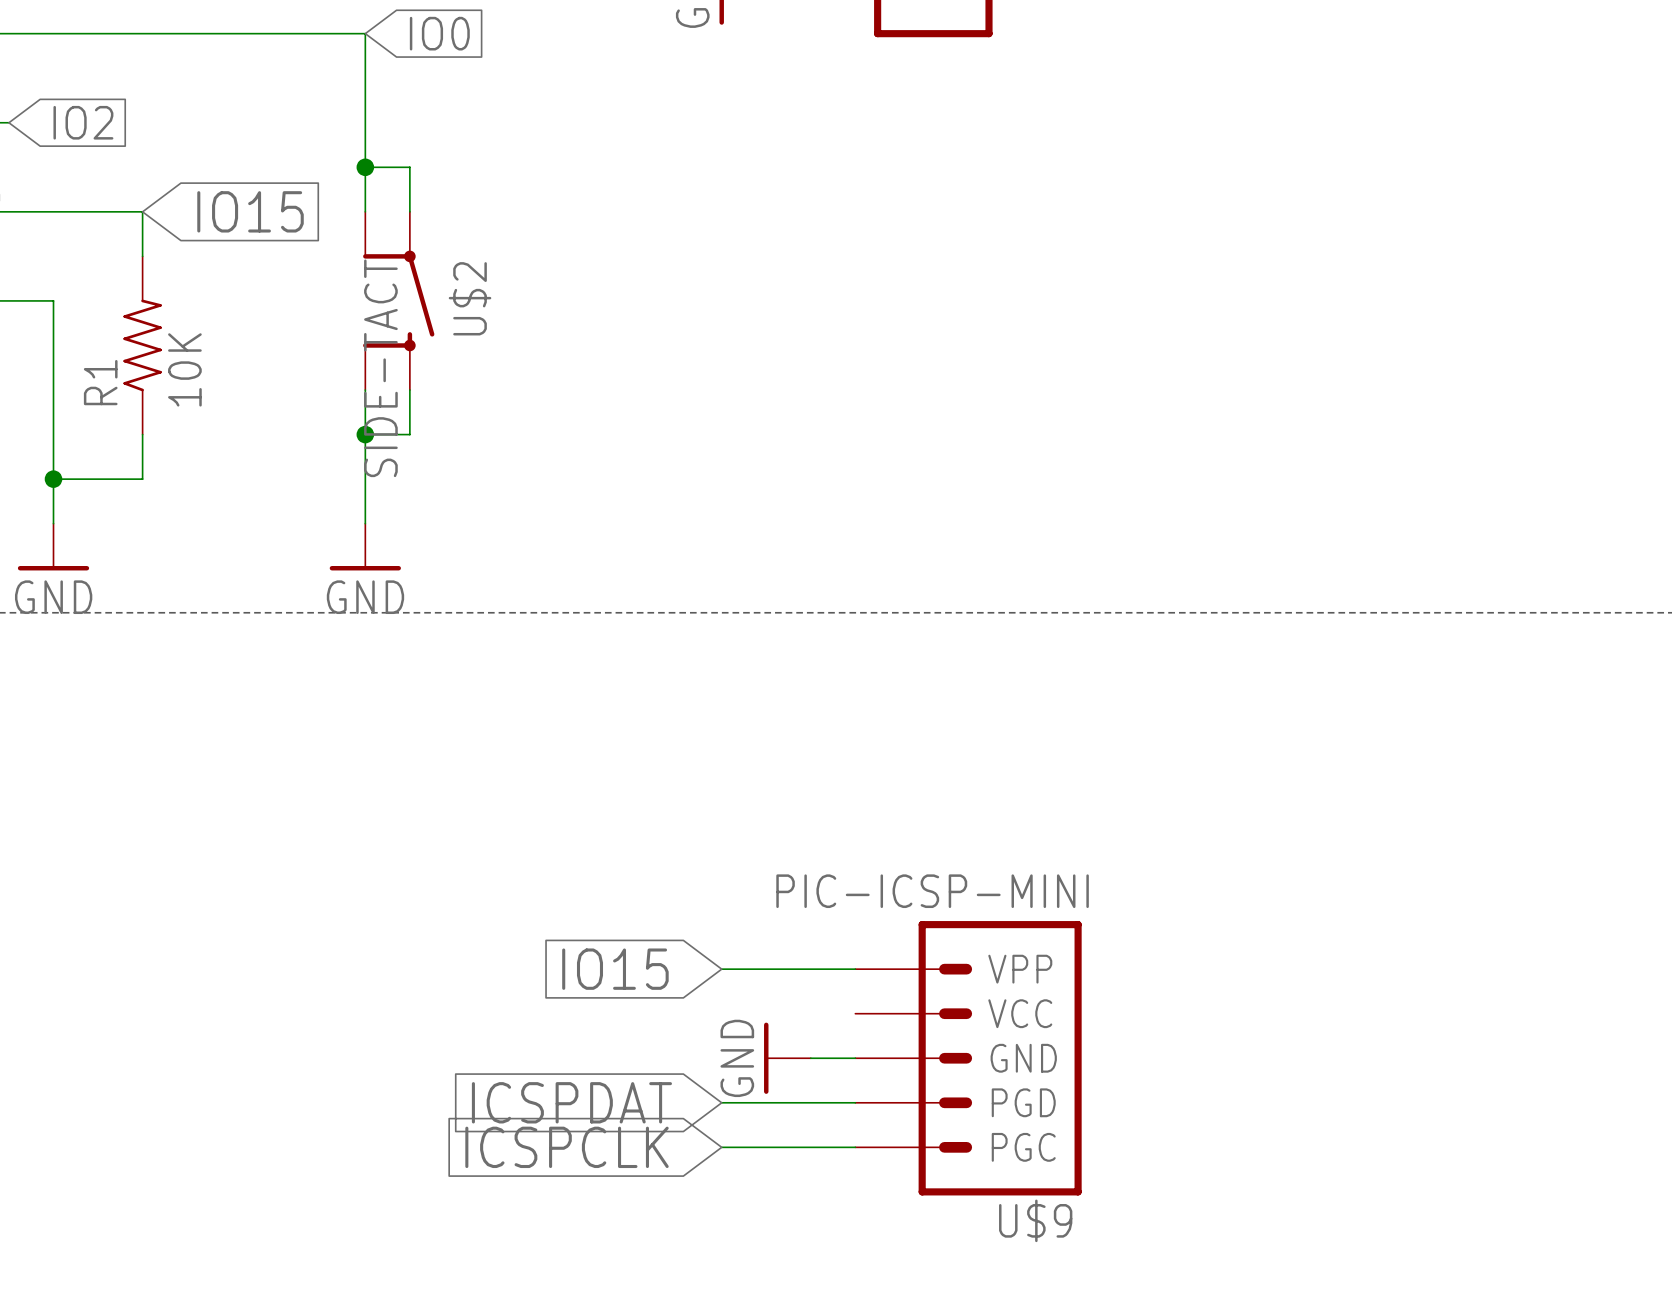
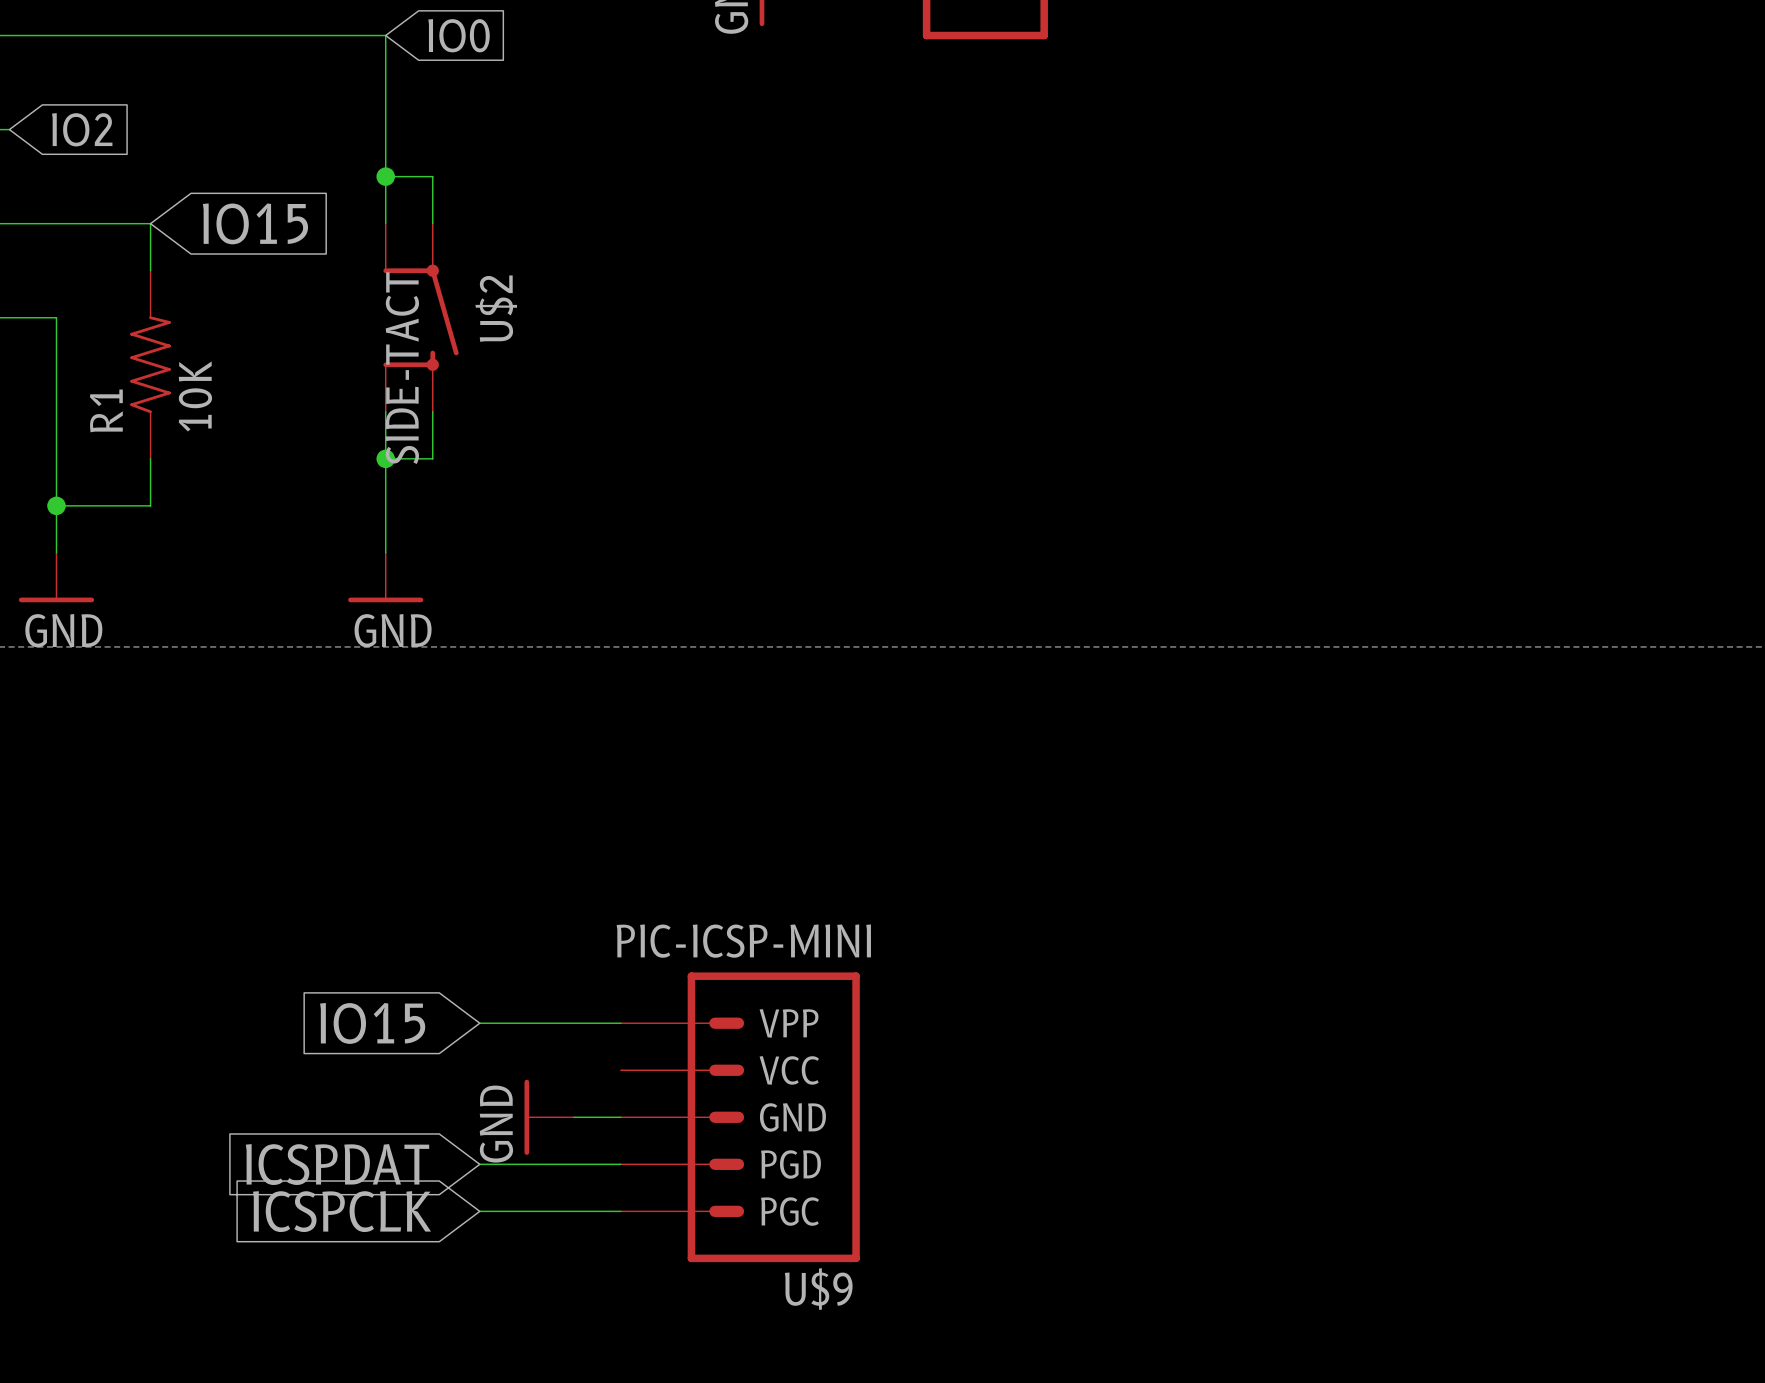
global label position: IO15 (615, 969) -> IO15 (372, 1023)
wire: (721, 969) (855, 969) -> (479, 1023) (620, 1023)
power symbol position: GND (787, 1058) -> GND (549, 1117)
wire: (810, 1058) (855, 1058) -> (573, 1117) (620, 1117)
U$9 position: (968, 1058) -> (740, 1117)
global label position: ICSPDAT (571, 1102) -> ICSPDAT (337, 1164)
wire: (721, 1102) (855, 1102) -> (479, 1164) (620, 1164)
global label position: ICSPCLK (567, 1147) -> ICSPCLK (342, 1211)
wire: (721, 1147) (855, 1147) -> (479, 1211) (620, 1211)

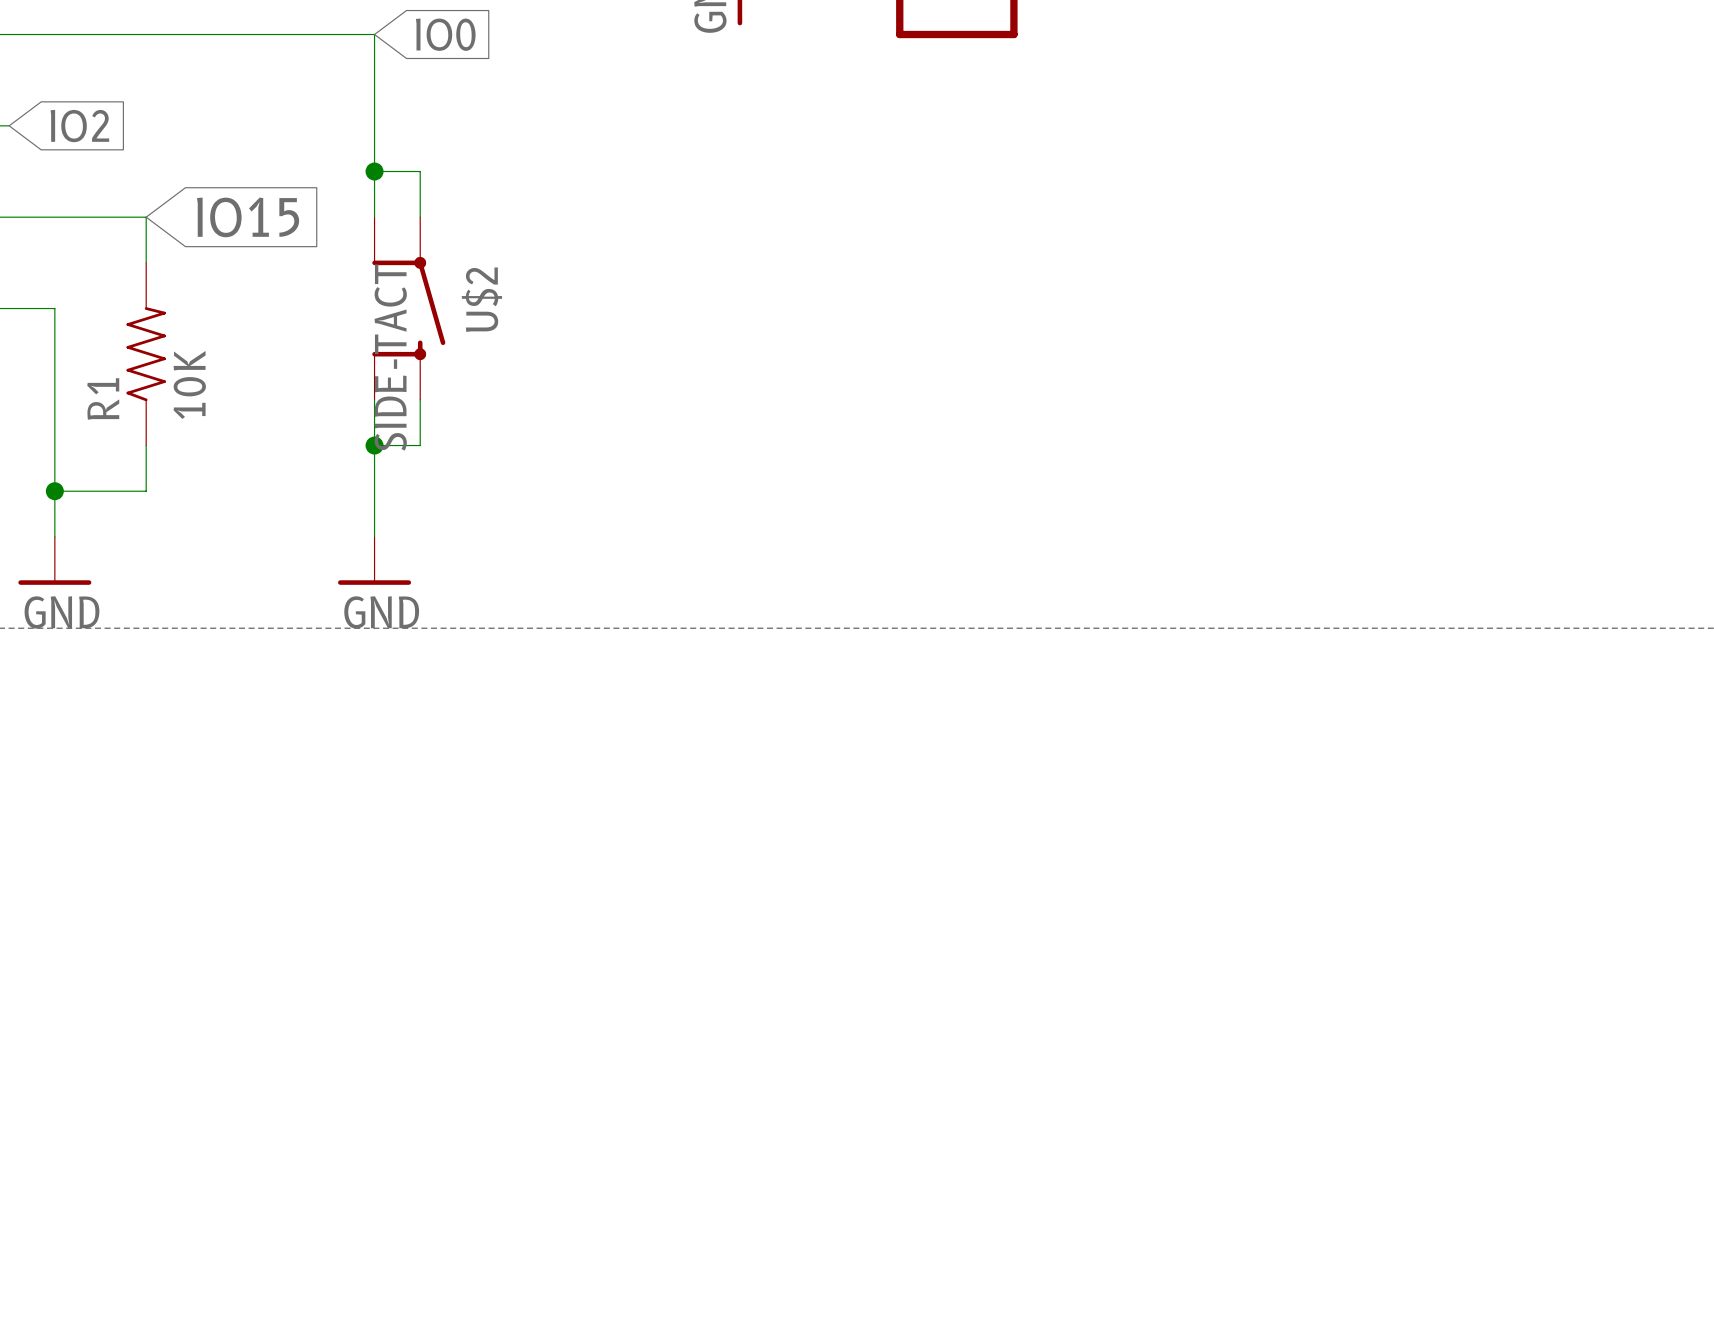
global label: IO15 (372, 1023) -> none
wire: (479, 1023) (620, 1023) -> none
power symbol: GND (549, 1117) -> none
wire: (573, 1117) (620, 1117) -> none
U$9: PIC-ICSP-MINI (740, 1117) -> none
global label: ICSPDAT (337, 1164) -> none
wire: (479, 1164) (620, 1164) -> none
global label: ICSPCLK (342, 1211) -> none
wire: (479, 1211) (620, 1211) -> none

